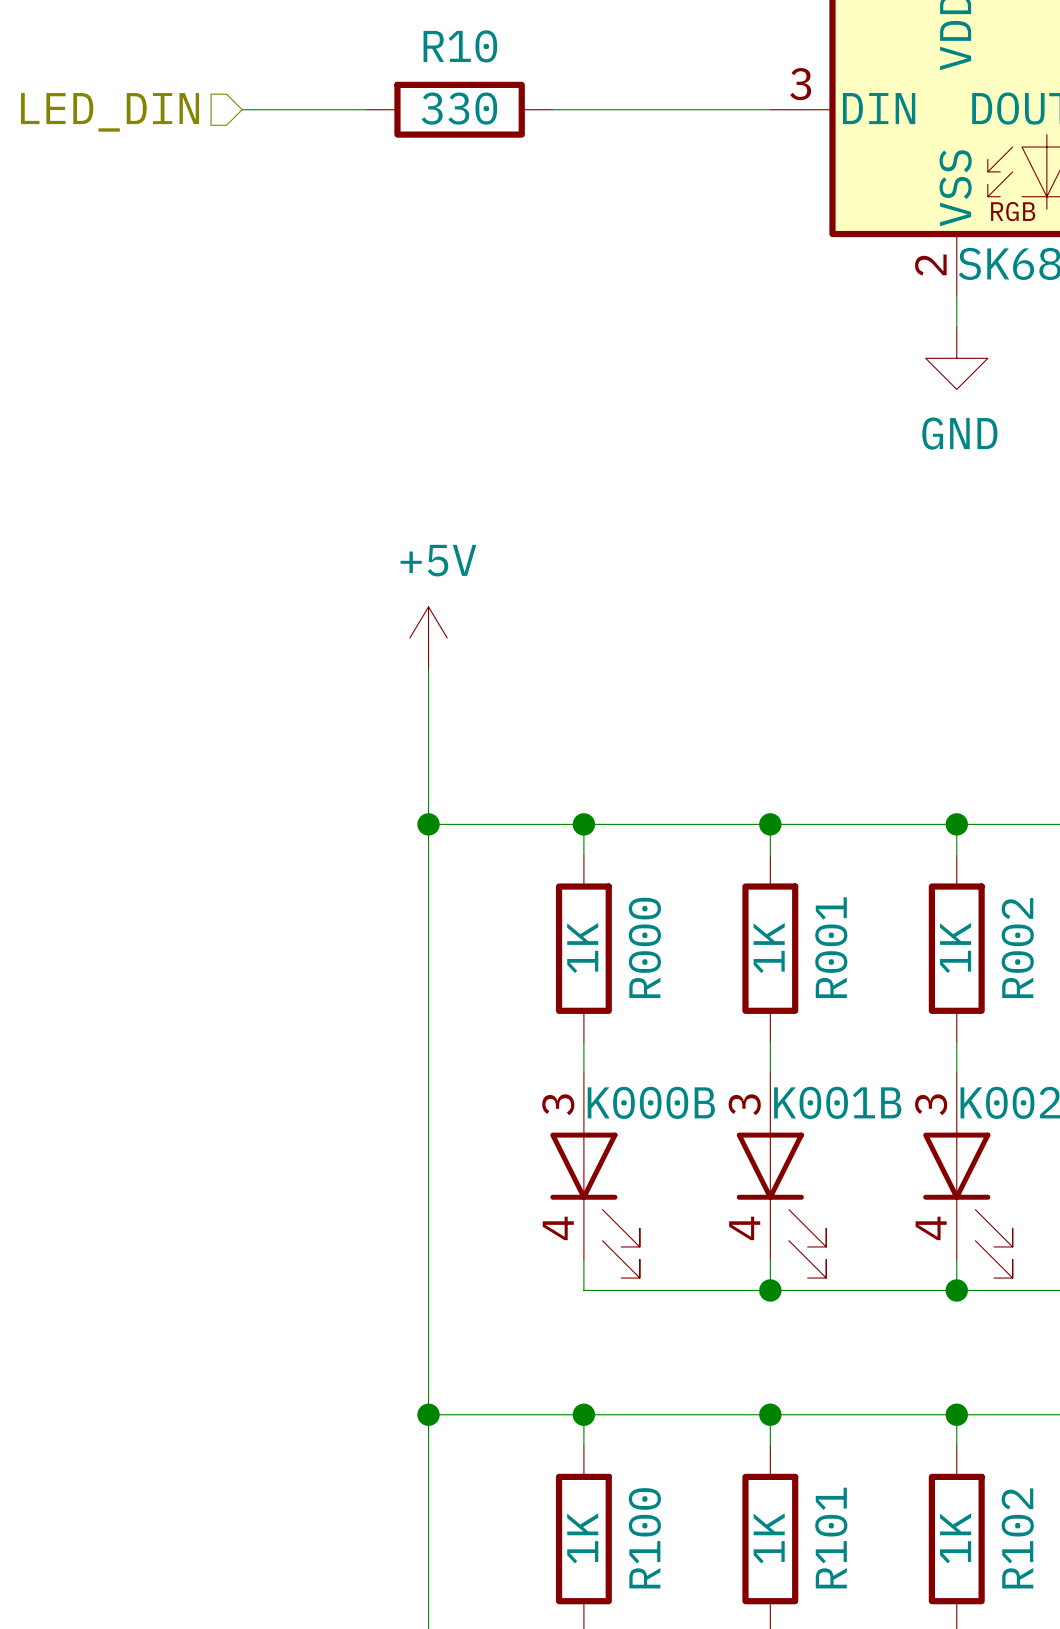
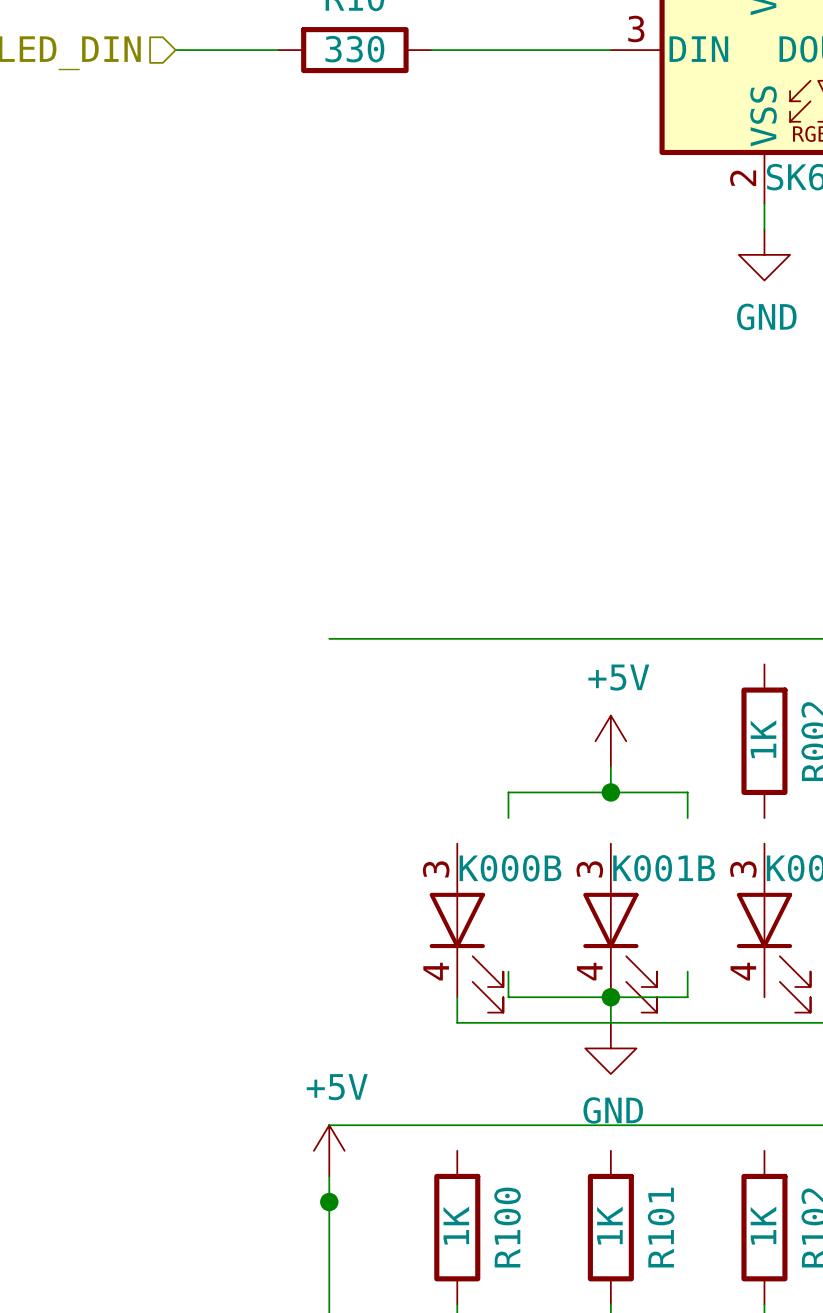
power symbol: +5V (428, 637) -> none
wire: (428, 669) (428, 1476) -> none
junction: (428, 824) -> none
wire: (583, 824) (583, 855) -> none
junction: (583, 824) -> none
wire: (770, 824) (770, 855) -> none
junction: (770, 824) -> none
wire: (956, 824) (956, 855) -> none
junction: (956, 824) -> none
R000: 1K (583, 948) -> none
R001: 1K (770, 948) -> none
power symbol: none -> +5V (610, 741)
junction: none -> (610, 792)
wire: (583, 1041) (583, 1072) -> none
wire: none -> (508, 818) (508, 792) (687, 792) (687, 818)
wire: (770, 1041) (770, 1072) -> (610, 766) (610, 792)
wire: (956, 1041) (956, 1072) -> none
wire: none -> (508, 971) (508, 997) (687, 997) (687, 971)
wire: (956, 1259) (956, 1290) -> none
junction position: (770, 1290) -> (610, 997)
junction: (956, 1290) -> none
power symbol: none -> GND (610, 1048)
junction: (428, 1414) -> none
wire: (583, 1414) (583, 1445) -> none
junction: (583, 1414) -> none
wire: (770, 1414) (770, 1445) -> none
junction: (770, 1414) -> none
wire: (956, 1414) (956, 1445) -> none
junction: (956, 1414) -> none
power symbol: none -> +5V (329, 1150)
junction: none -> (329, 1202)

